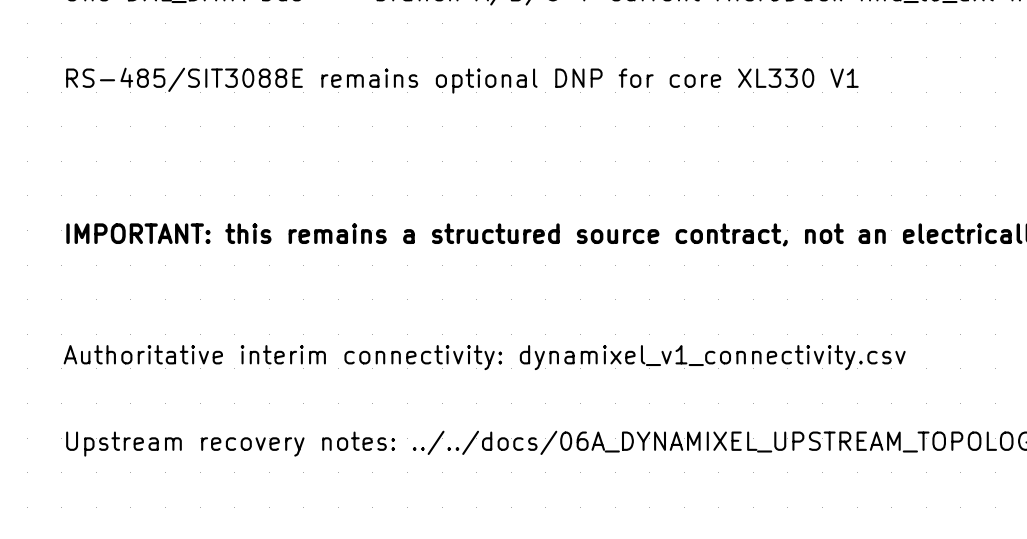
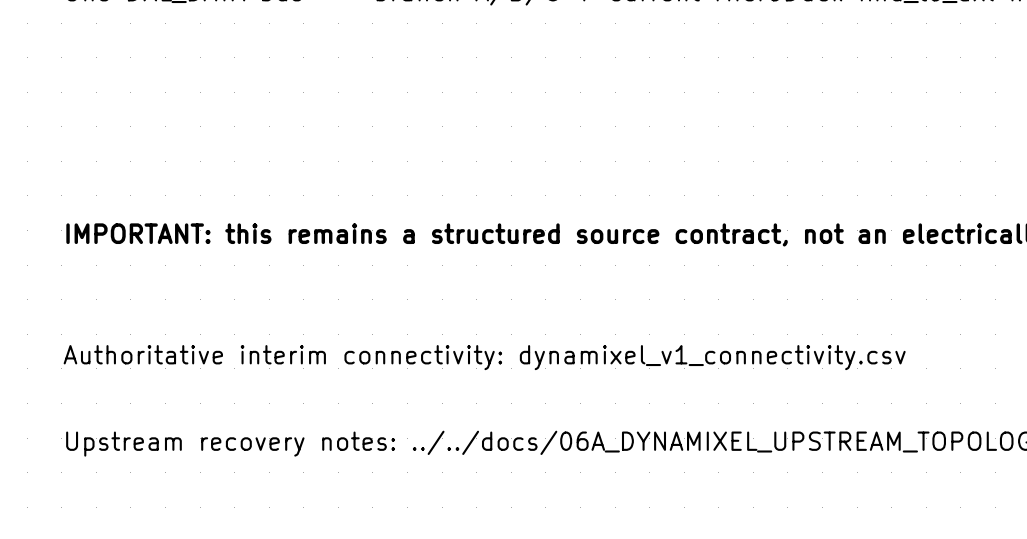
text: RS-485/SIT3088E remains optional DNP for core XL330 V1 (462, 80) -> none

